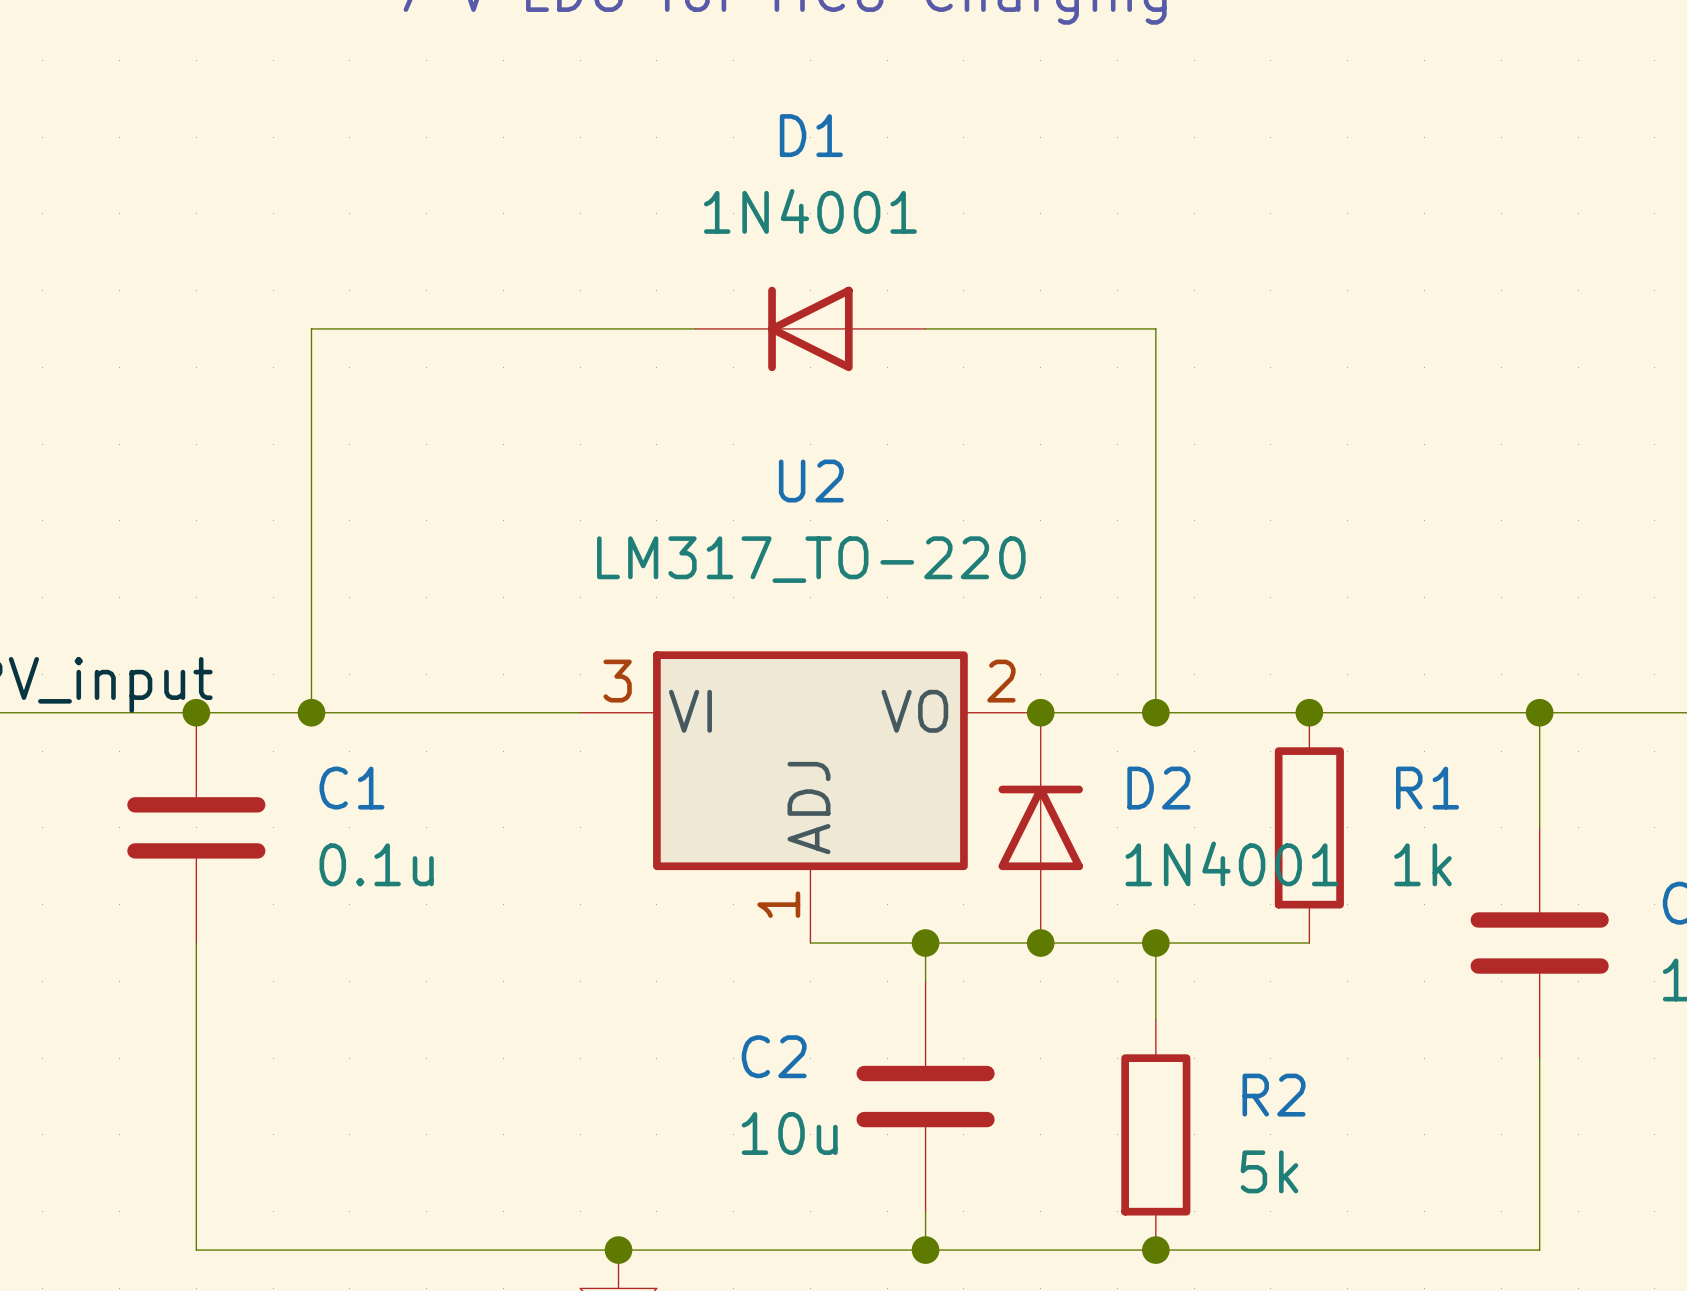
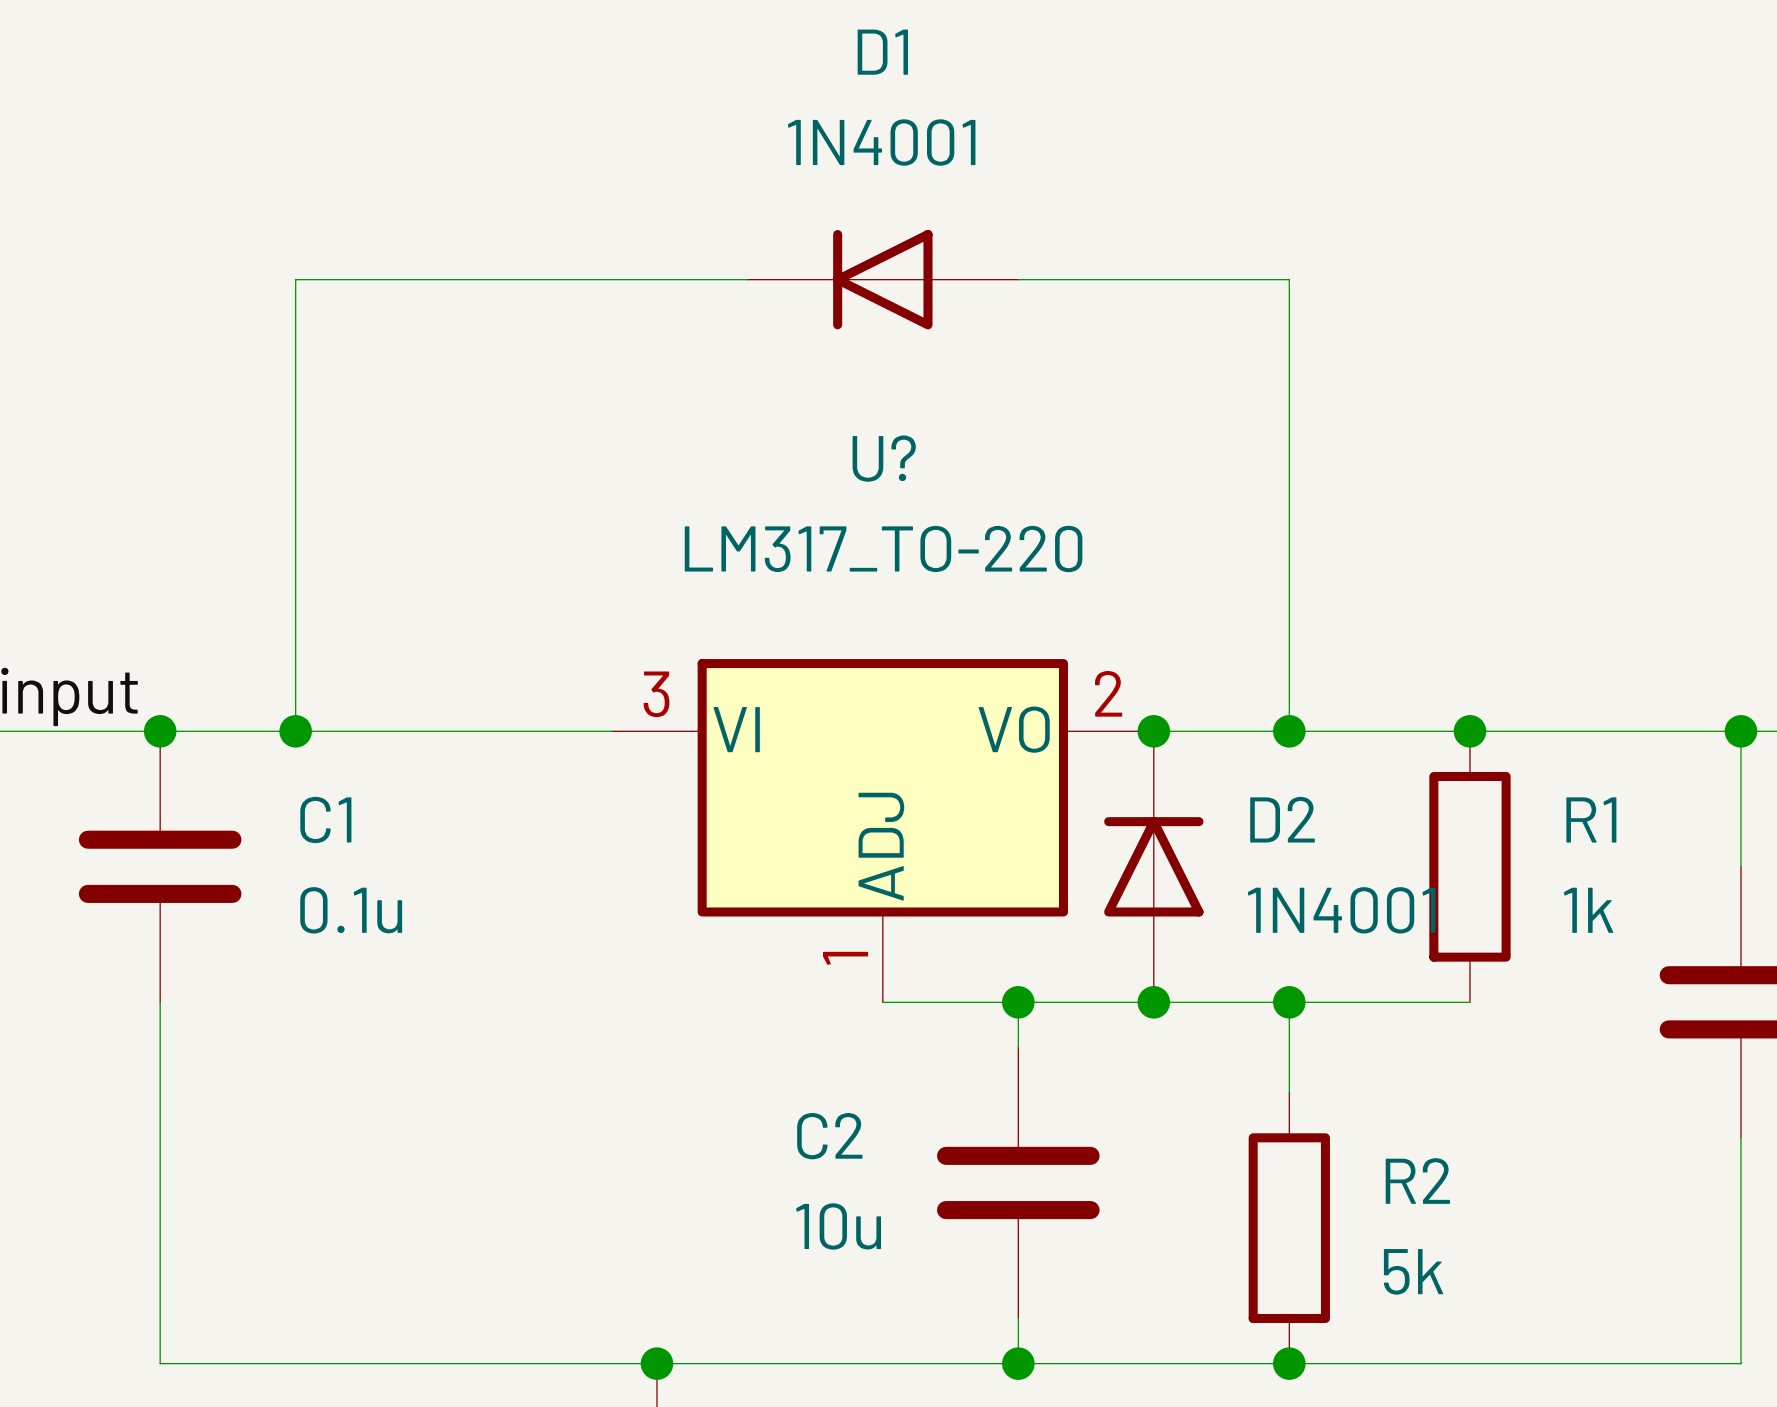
U2 name: U2 (811, 481) -> U? (884, 458)

